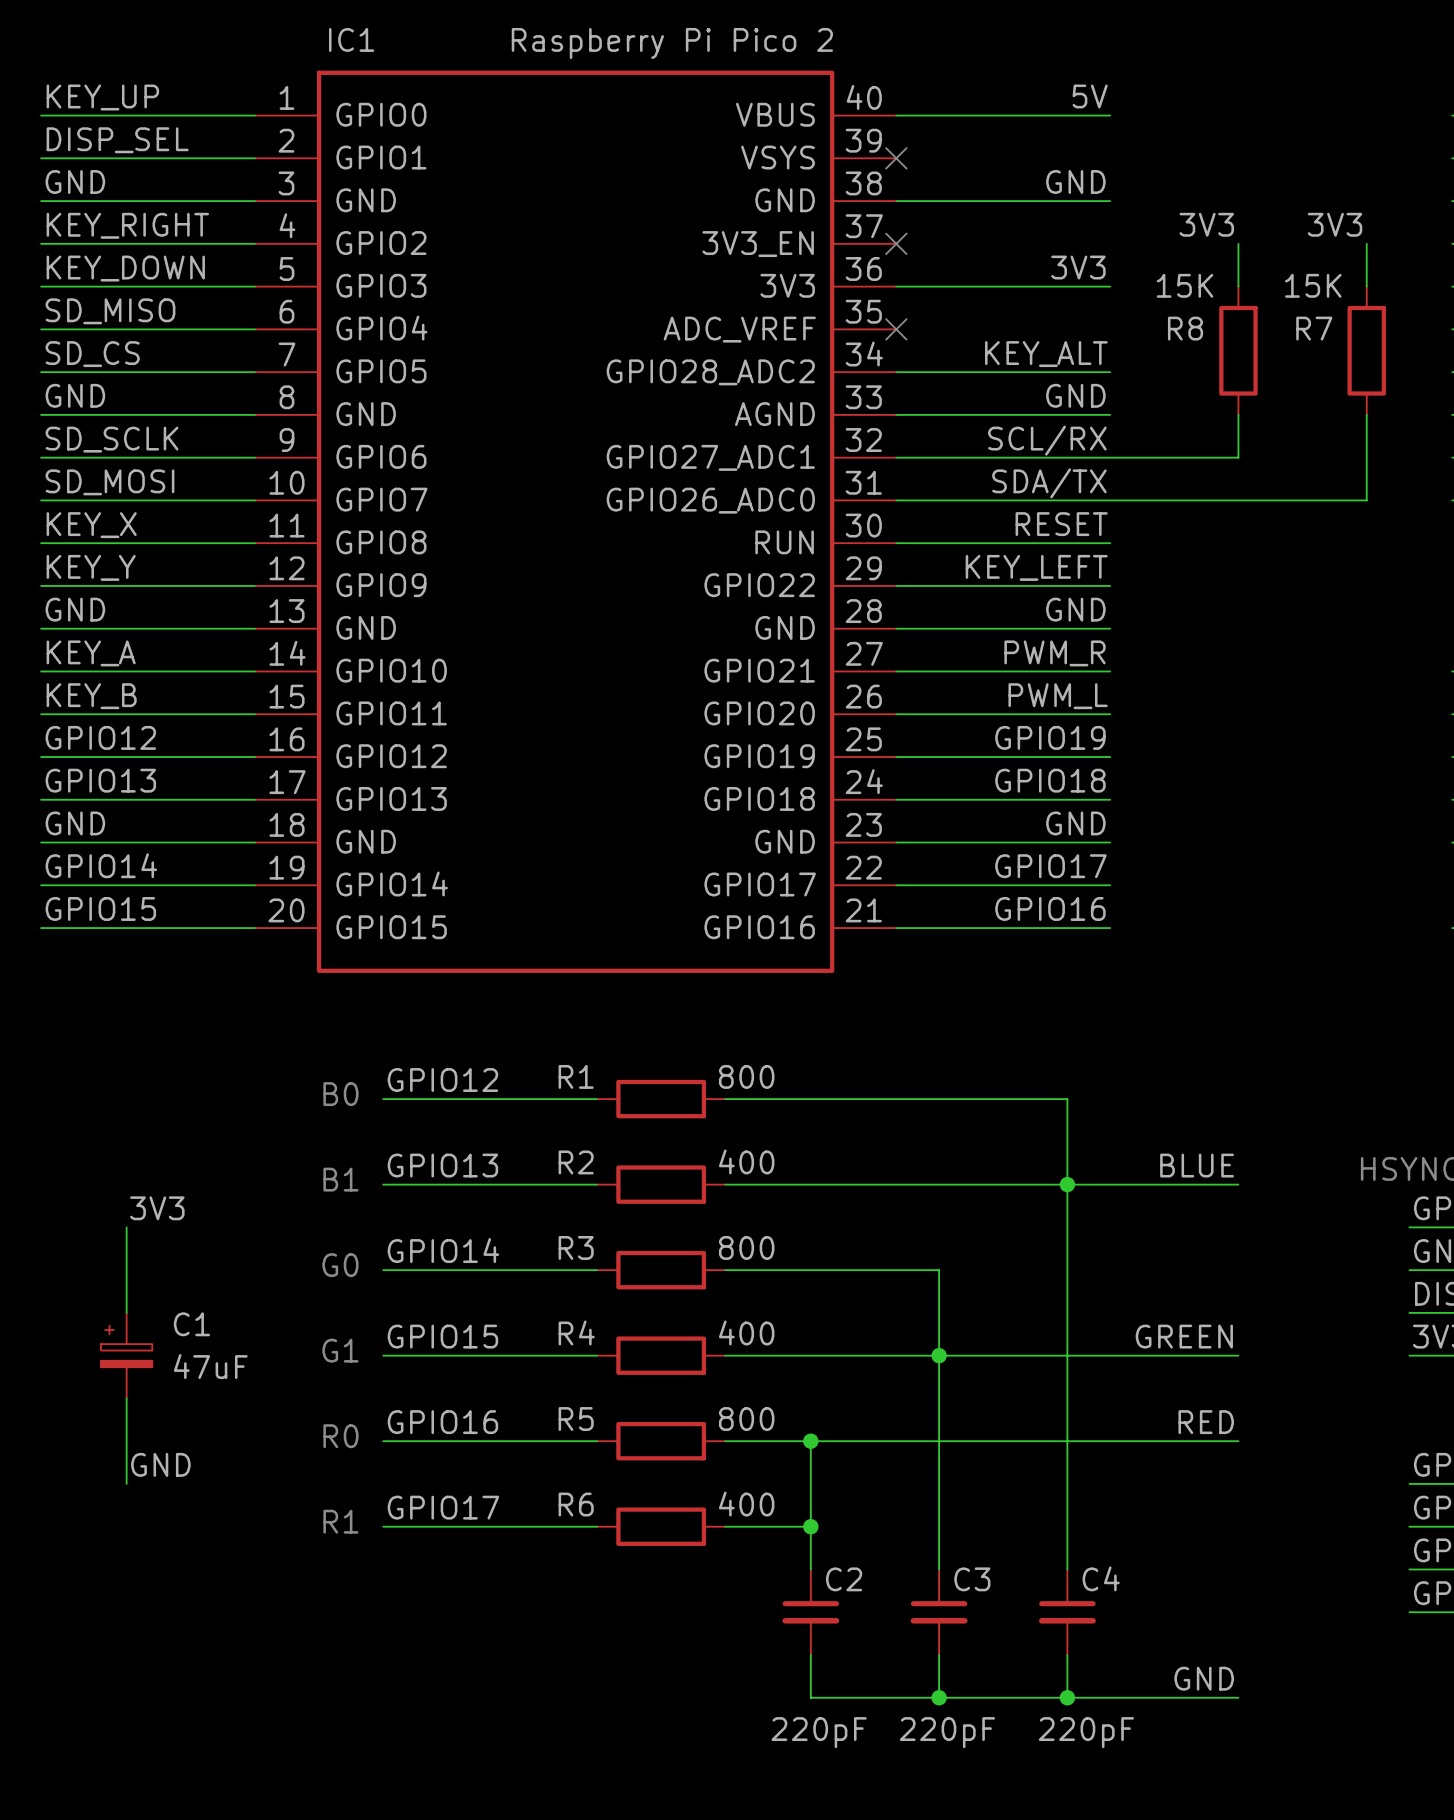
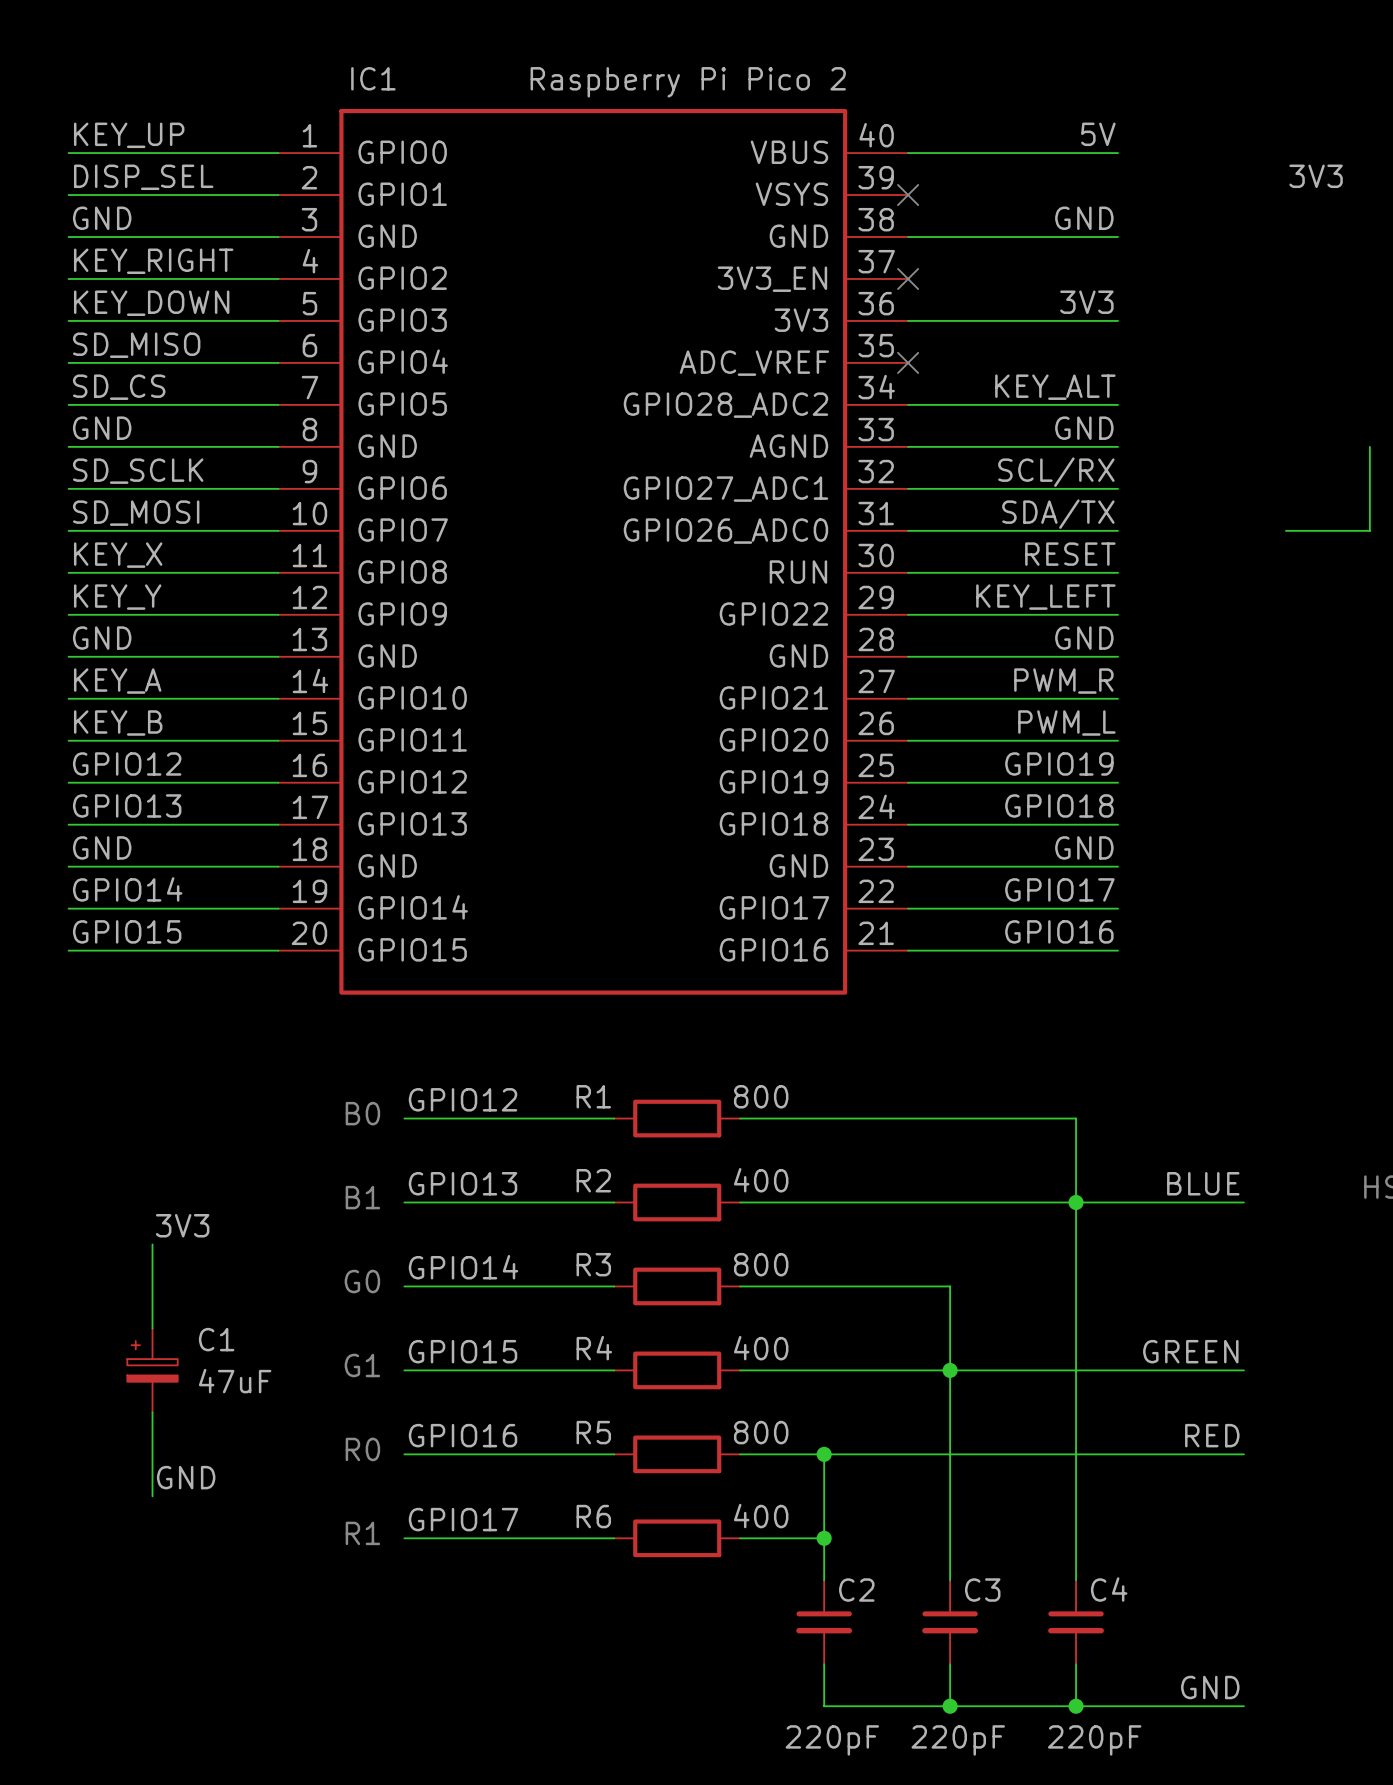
label: none -> 3V3 (1316, 176)
label: 3V3 (1206, 224) -> none
label: 3V3 (1335, 224) -> none
wire: (1238, 243) (1238, 286) -> none
wire: (1366, 243) (1366, 286) -> none
R8: 15K (1238, 350) -> none
R7: 15K (1366, 350) -> none
wire: (1238, 414) (1238, 457) (1110, 457) -> none
wire: (1110, 500) (1281, 500) -> none

